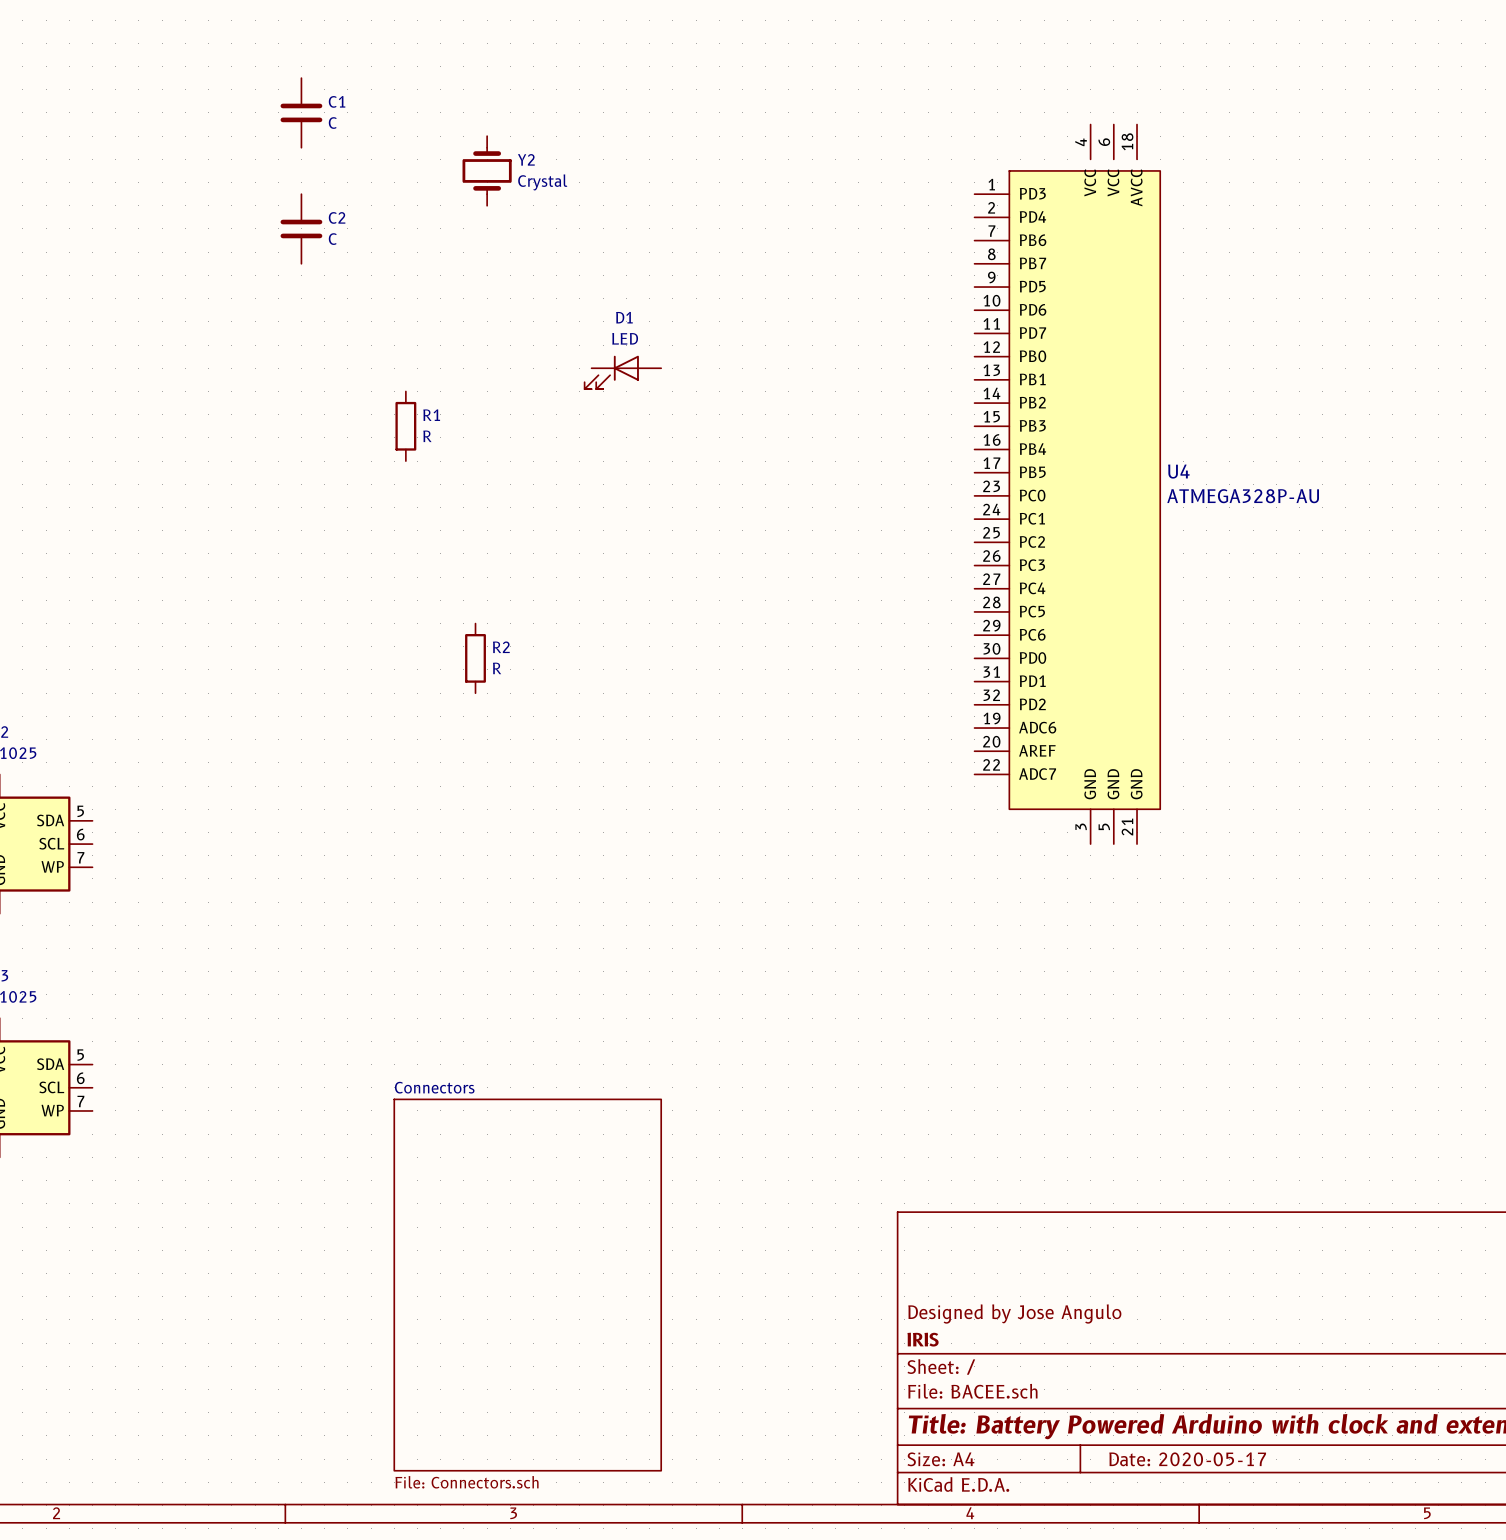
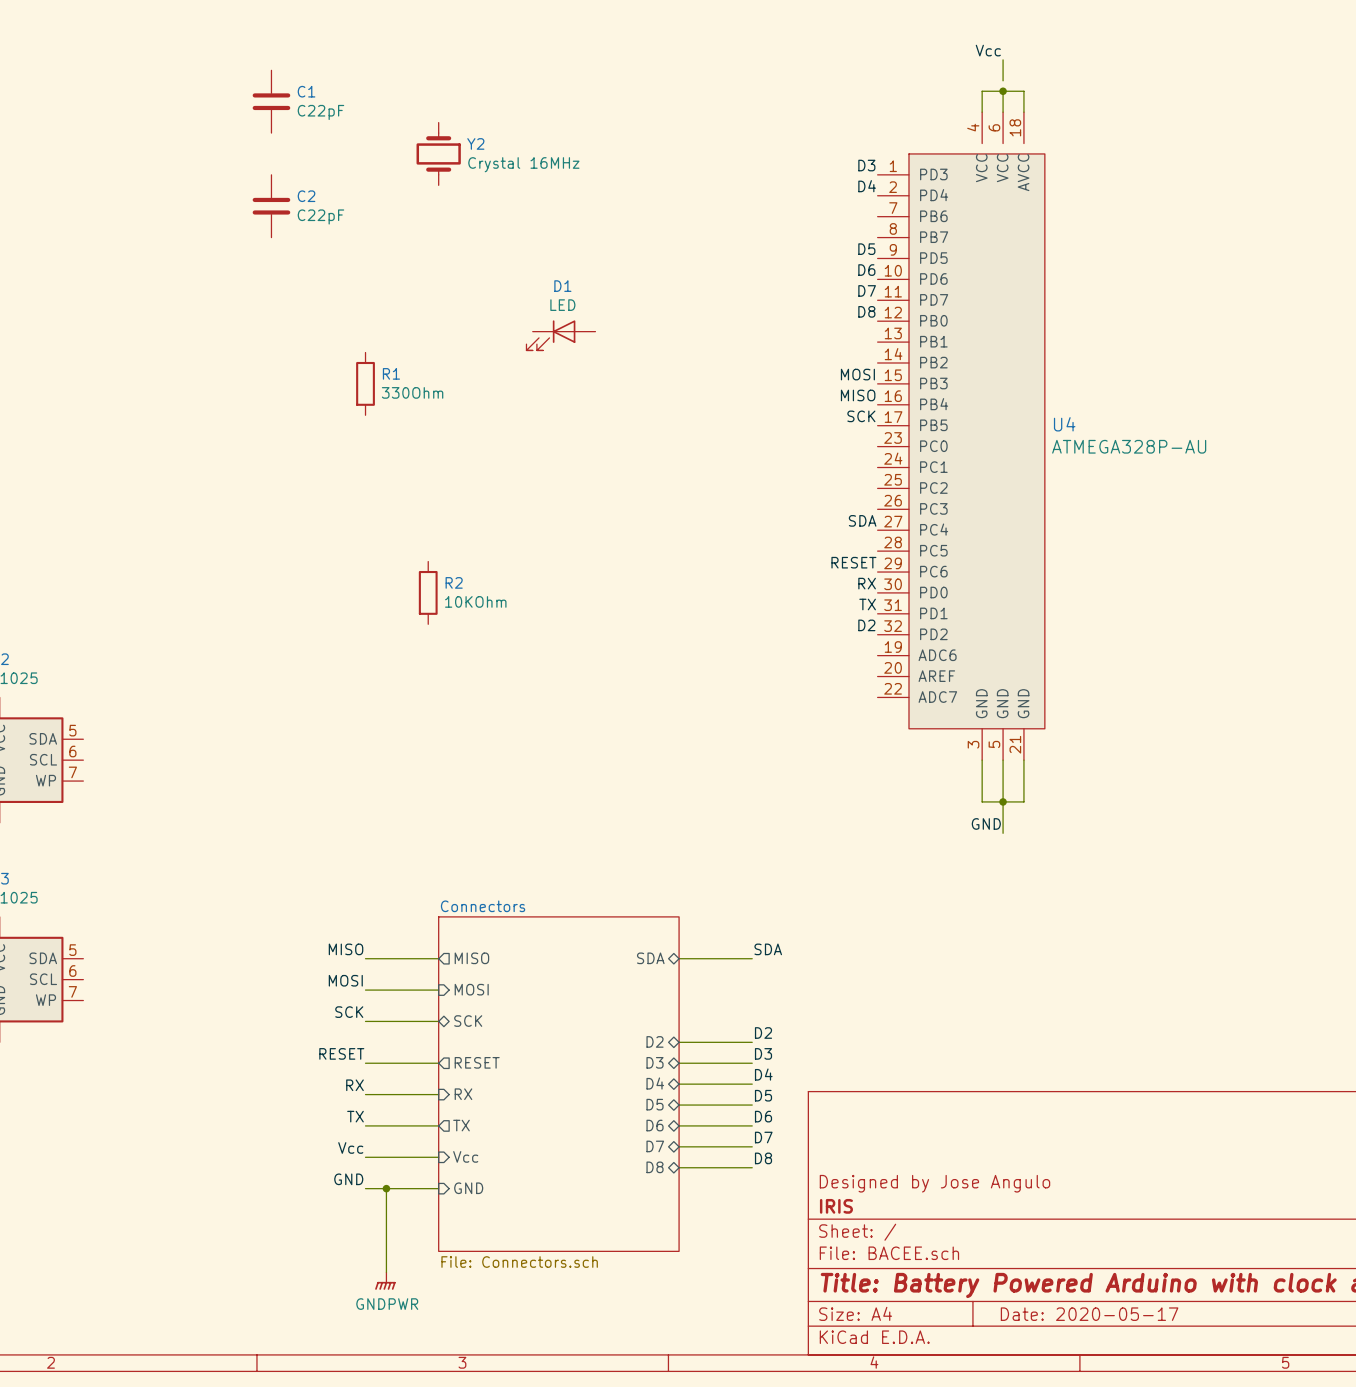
label: none -> Vcc (988, 50)
wire: none -> (1003, 59) (1003, 80)
wire: none -> (1003, 91) (1003, 112)
junction: none -> (1003, 91)
C1 value: C (332, 123) -> C22pF (320, 112)
wire: none -> (982, 112) (982, 91) (1023, 91) (1023, 112)
Y2 value: Crystal (542, 182) -> Crystal 16MHz (523, 164)
label: none -> D3 (866, 165)
label: none -> D4 (867, 186)
C2 value: C (332, 239) -> C22pF (320, 216)
label: none -> D5 (866, 249)
label: none -> D6 (866, 270)
label: none -> D7 (867, 290)
label: none -> D8 (866, 311)
label: none -> MOSI (857, 374)
R1 value: R (427, 436) -> 330Ohm (412, 392)
label: none -> MISO (858, 395)
label: none -> SCK (861, 416)
label: none -> SDA (862, 520)
label: none -> RESET (853, 562)
label: none -> RX (867, 583)
R2 value: R (497, 668) -> 10KOhm (475, 601)
label: none -> TX (867, 604)
label: none -> D2 (866, 625)
wire: none -> (982, 760) (982, 801) (1023, 801) (1023, 760)
wire: none -> (1003, 760) (1003, 833)
junction: none -> (1003, 801)
label: none -> GND (986, 823)
label: none -> MISO (346, 949)
label: none -> SDA (768, 949)
wire: none -> (365, 958) (438, 958)
sheet pin: none -> MISO (471, 958)
sheet pin: none -> SDA (650, 958)
wire: none -> (679, 958) (752, 958)
label: none -> MOSI (345, 980)
sheet pin: none -> MOSI (471, 989)
label: none -> SCK (349, 1012)
sheet pin: none -> SCK (468, 1021)
wire: none -> (365, 1021) (438, 1021)
label: none -> D2 (763, 1033)
sheet pin: none -> D2 (655, 1041)
wire: none -> (679, 1042) (752, 1042)
label: none -> RESET (341, 1053)
label: none -> D3 (763, 1053)
wire: none -> (365, 1063) (438, 1063)
sheet pin: none -> RESET (477, 1062)
sheet pin: none -> D3 (655, 1062)
wire: none -> (679, 1063) (752, 1063)
label: none -> D4 (763, 1074)
sheet pin: none -> D4 (655, 1083)
wire: none -> (679, 1084) (752, 1084)
label: none -> RX (354, 1085)
wire: none -> (365, 1094) (438, 1094)
sheet pin: none -> RX (463, 1094)
label: none -> D5 (763, 1095)
sheet pin: none -> D5 (655, 1104)
wire: none -> (679, 1105) (752, 1105)
label: none -> TX (355, 1116)
label: none -> D6 (763, 1116)
sheet pin: none -> TX (461, 1125)
sheet pin: none -> D6 (655, 1125)
wire: none -> (365, 1125) (438, 1125)
wire: none -> (679, 1125) (752, 1125)
label: none -> D7 (763, 1137)
sheet pin: none -> D7 (655, 1146)
wire: none -> (679, 1146) (752, 1146)
label: none -> Vcc (350, 1147)
sheet pin: none -> Vcc (465, 1156)
wire: none -> (365, 1157) (438, 1157)
sheet Connectors position: (527, 1285) -> (558, 1084)
label: none -> D8 (763, 1158)
sheet pin: none -> D8 (655, 1167)
wire: none -> (679, 1167) (752, 1167)
label: none -> GND (348, 1179)
wire: none -> (365, 1188) (438, 1188)
wire: none -> (386, 1188) (386, 1272)
junction: none -> (386, 1188)
sheet pin: none -> GND (468, 1188)
power symbol: none -> GNDPWR (385, 1281)

